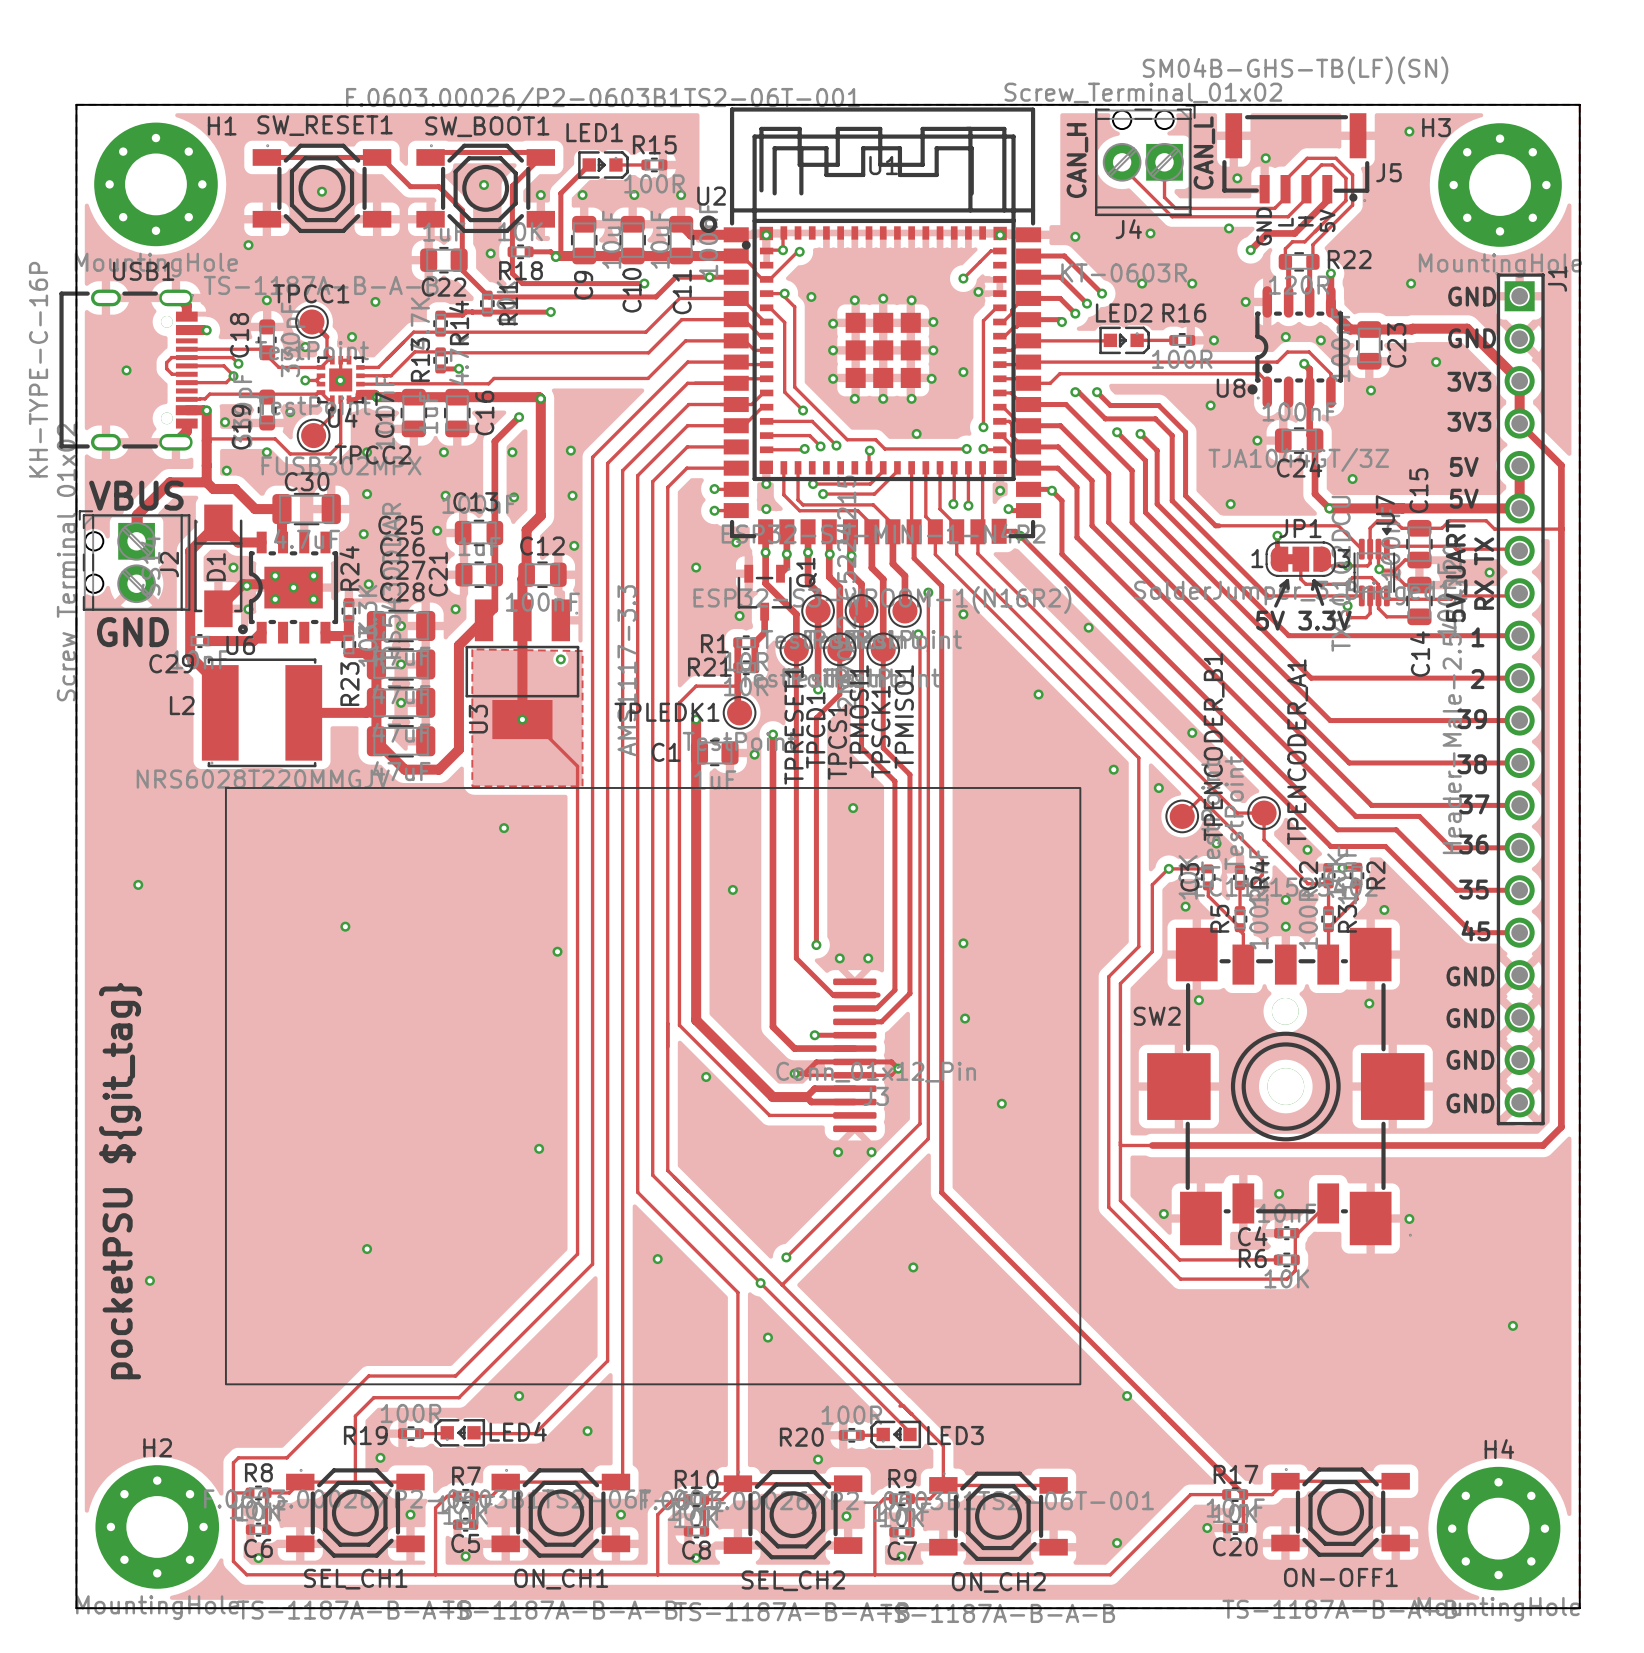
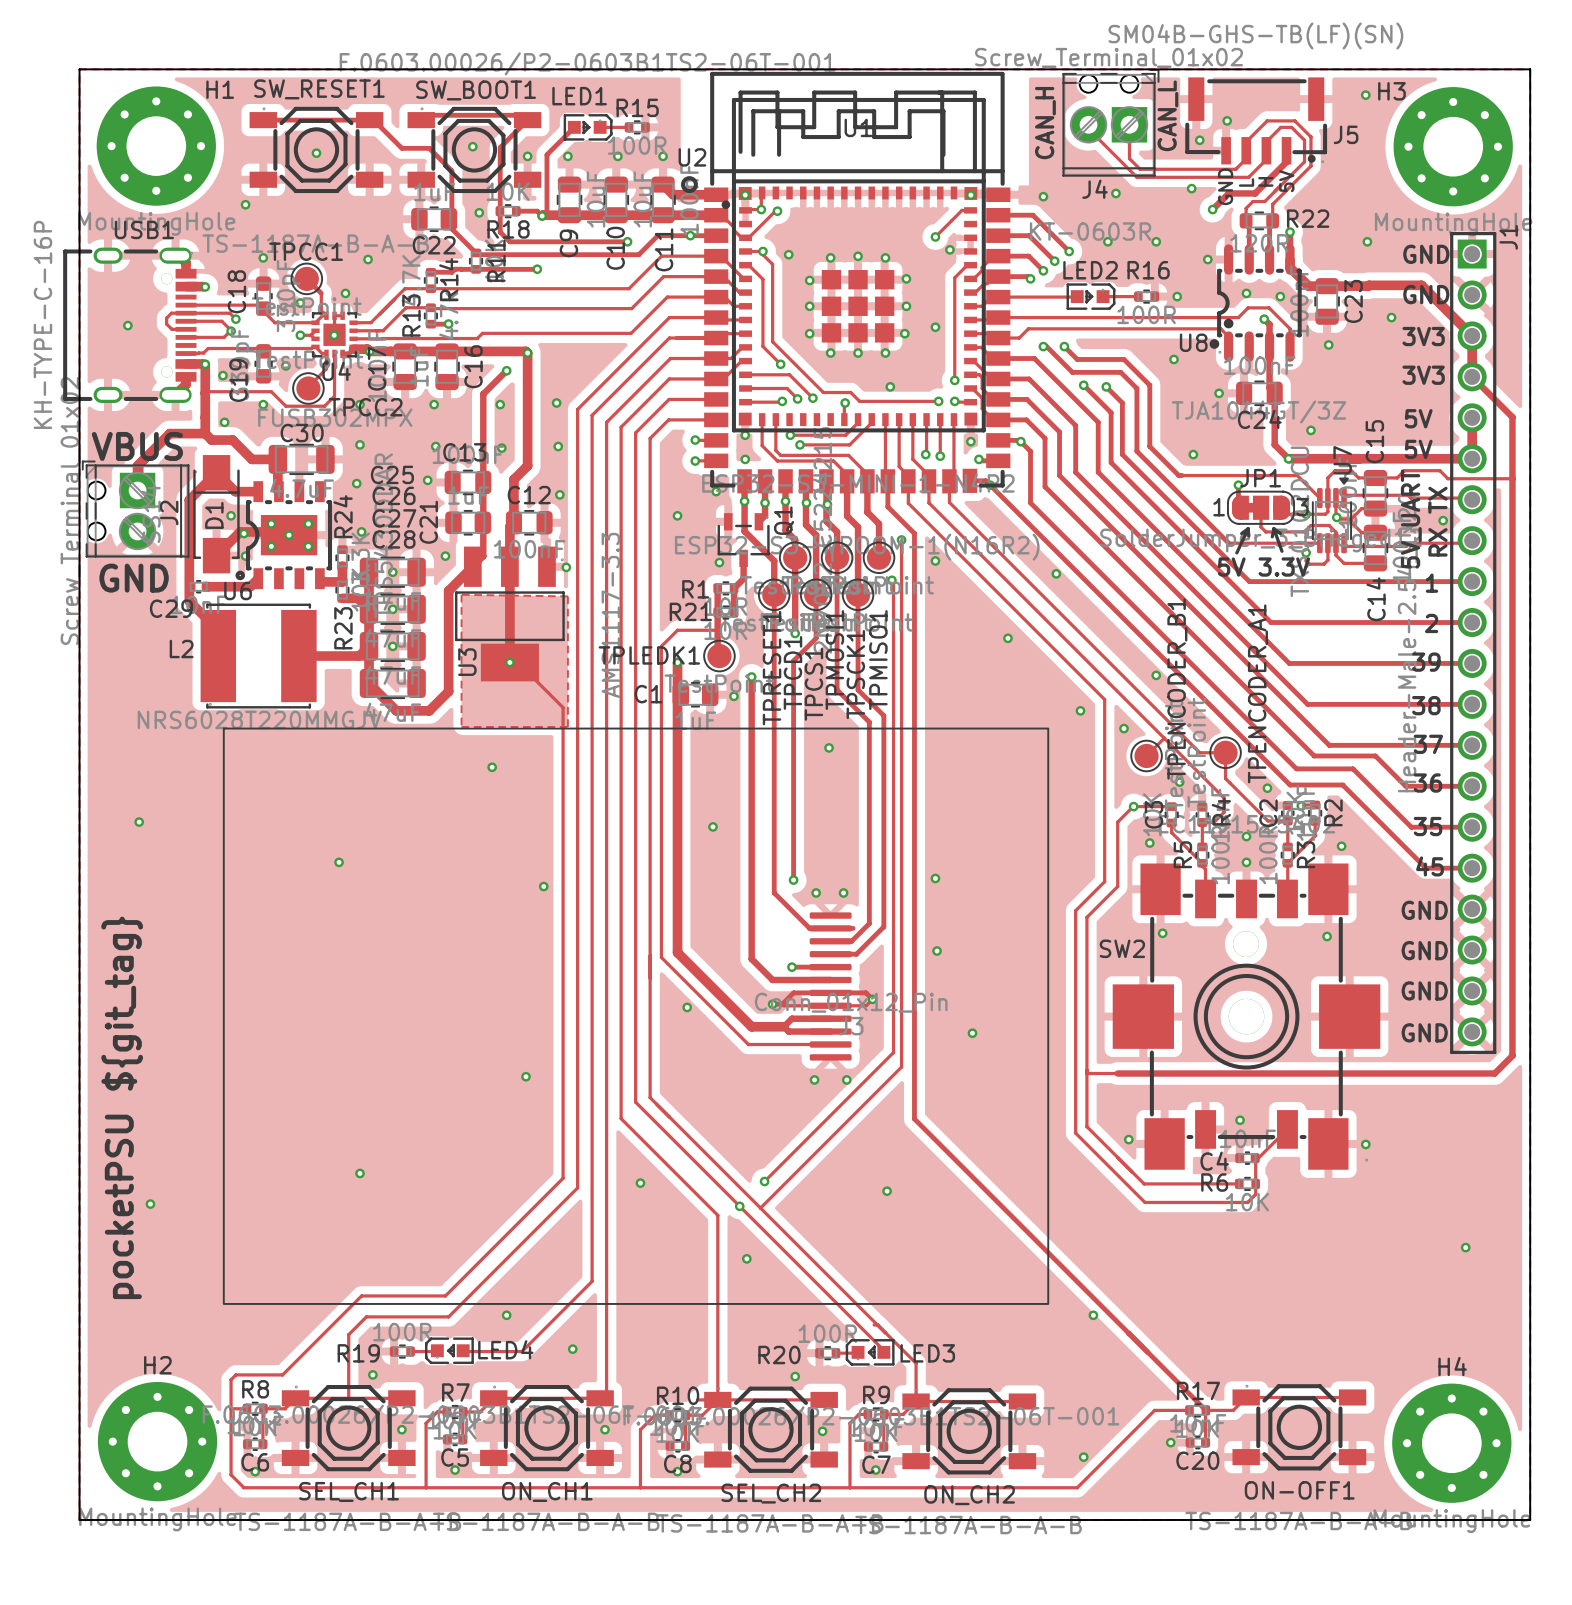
via position: (560, 659) -> (566, 567)

